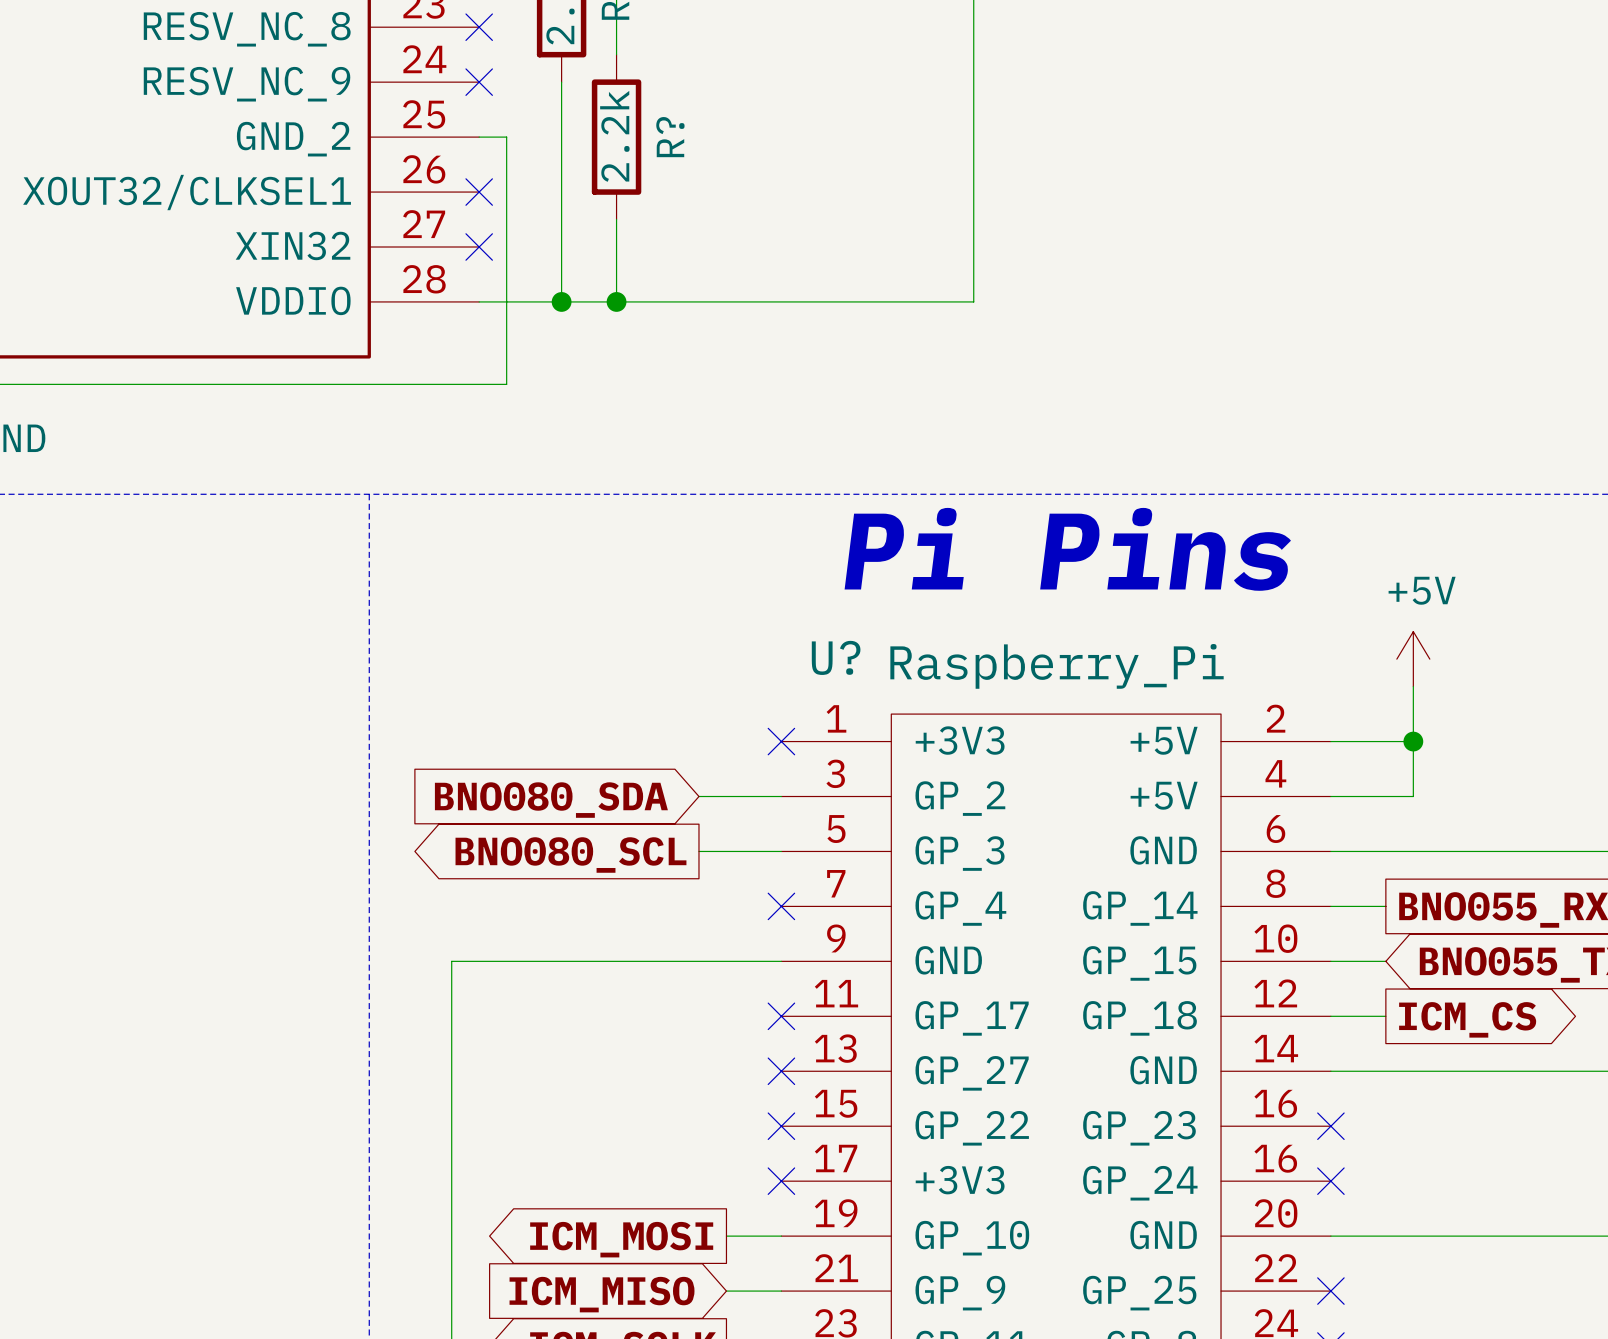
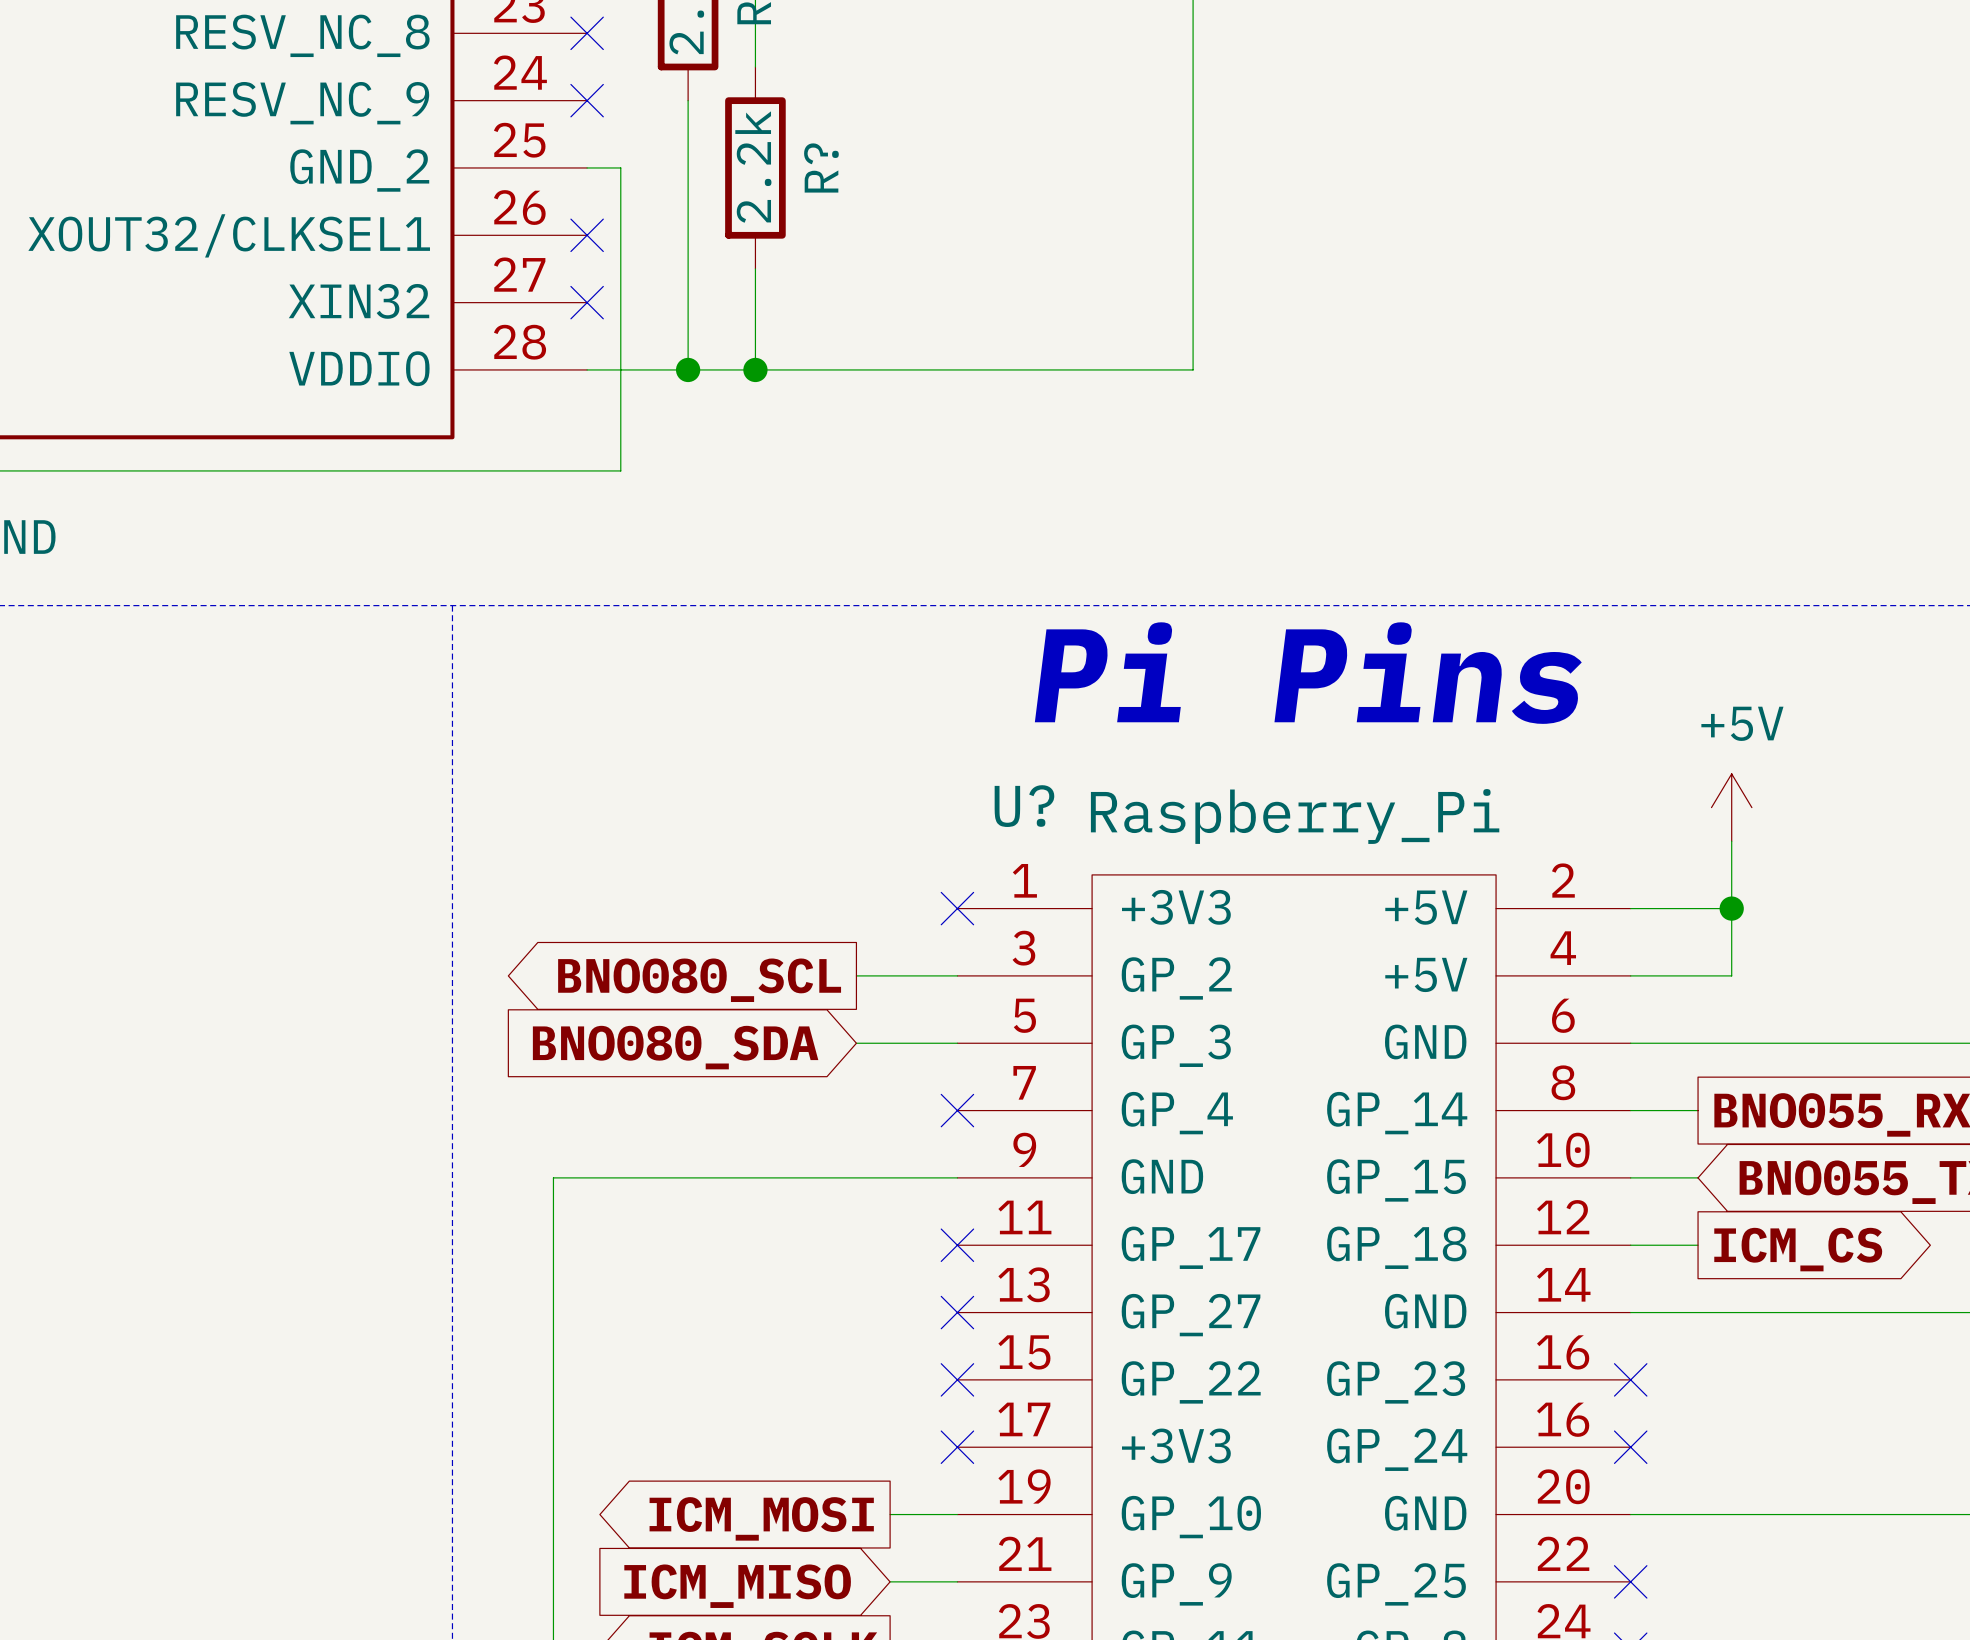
global label shape: input (551, 800) -> output (699, 980)
global label: BNO080_SDA (551, 800) -> BNO080_SCL (699, 980)
global label shape: output (570, 855) -> input (675, 1047)
global label: BNO080_SCL (570, 855) -> BNO080_SDA (675, 1047)

